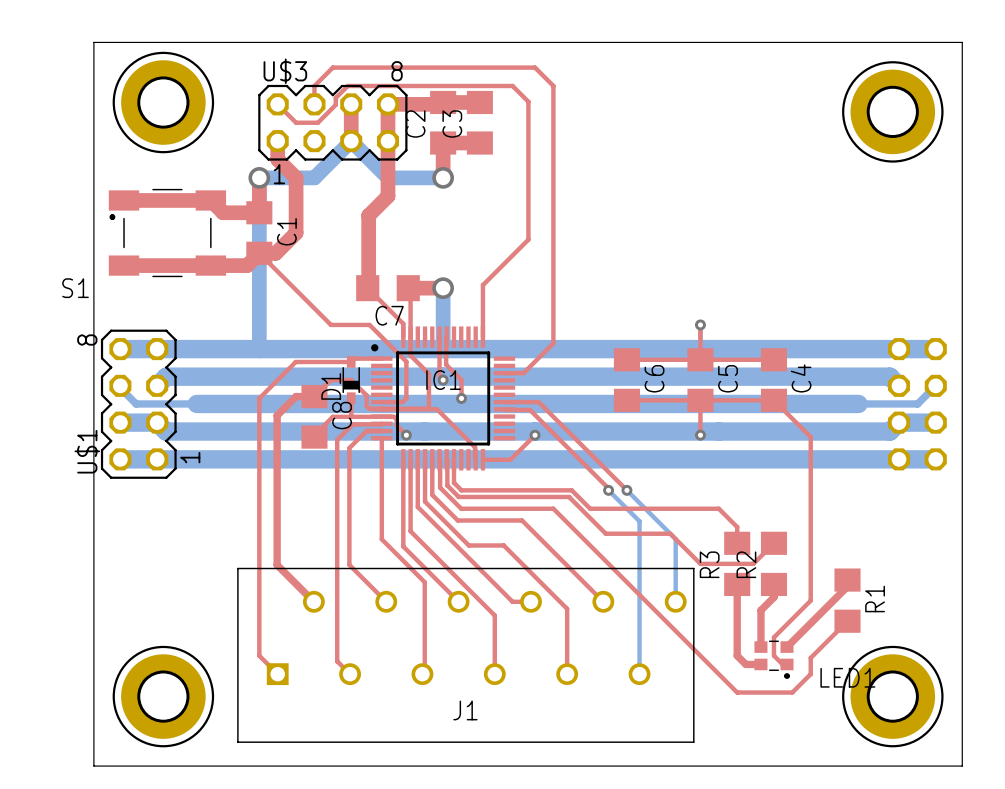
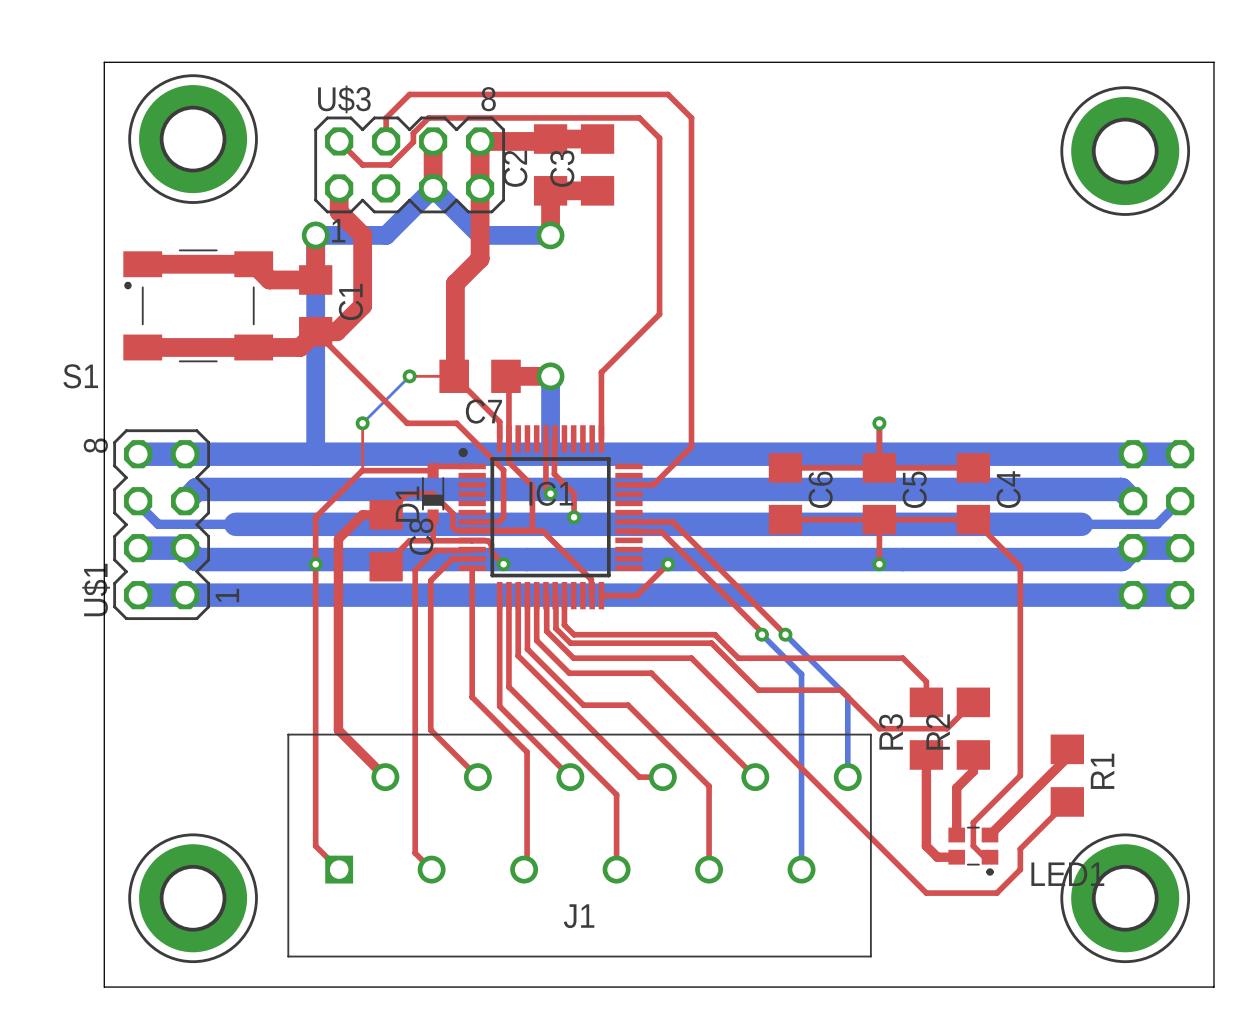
bottom track: none -> (409, 376) (362, 423)
top track: none -> (409, 376) (454, 376)
via: none -> (409, 376)
top track: none -> (362, 423) (362, 470)
via: none -> (362, 423)
via: none -> (315, 564)

